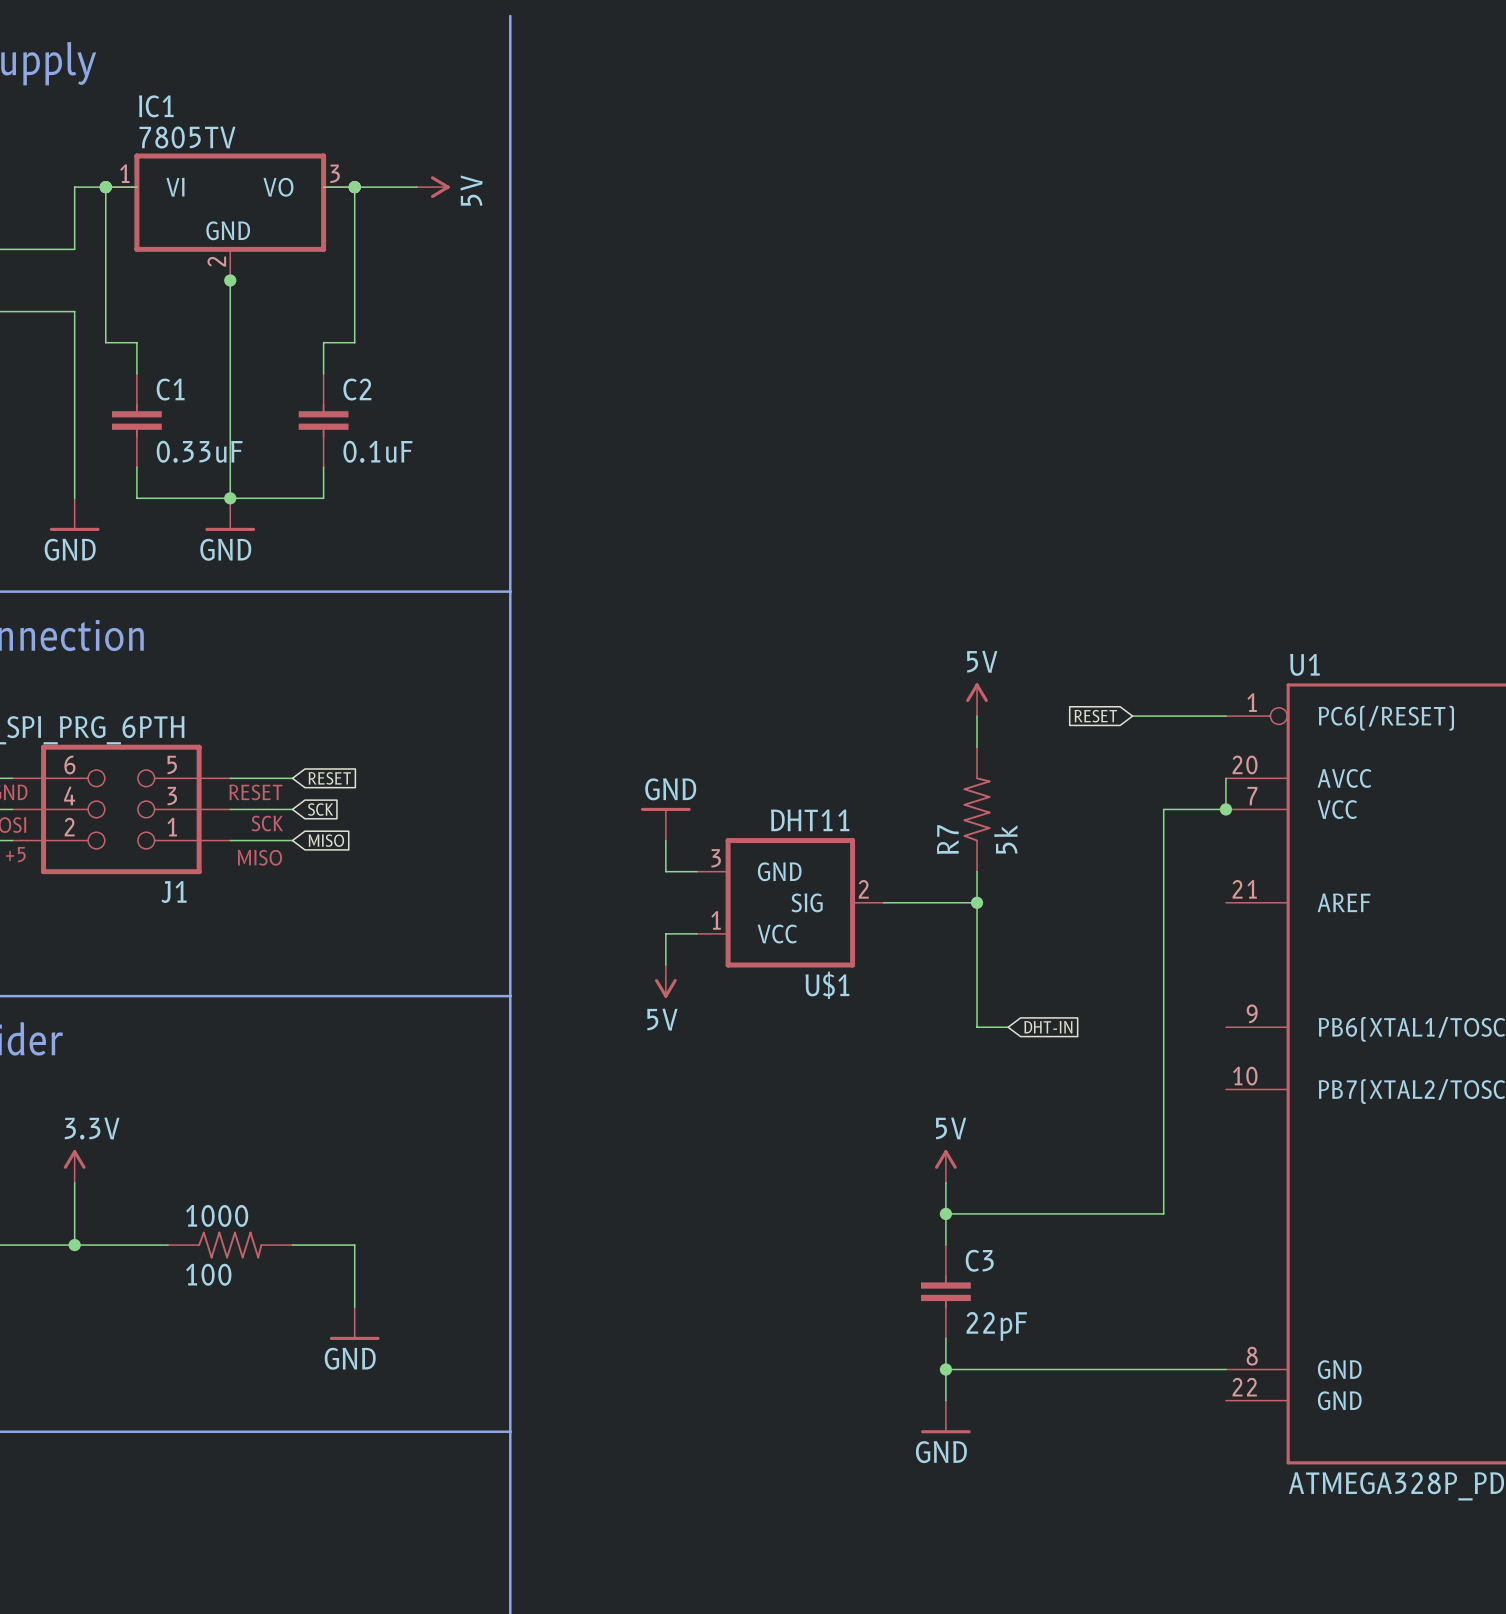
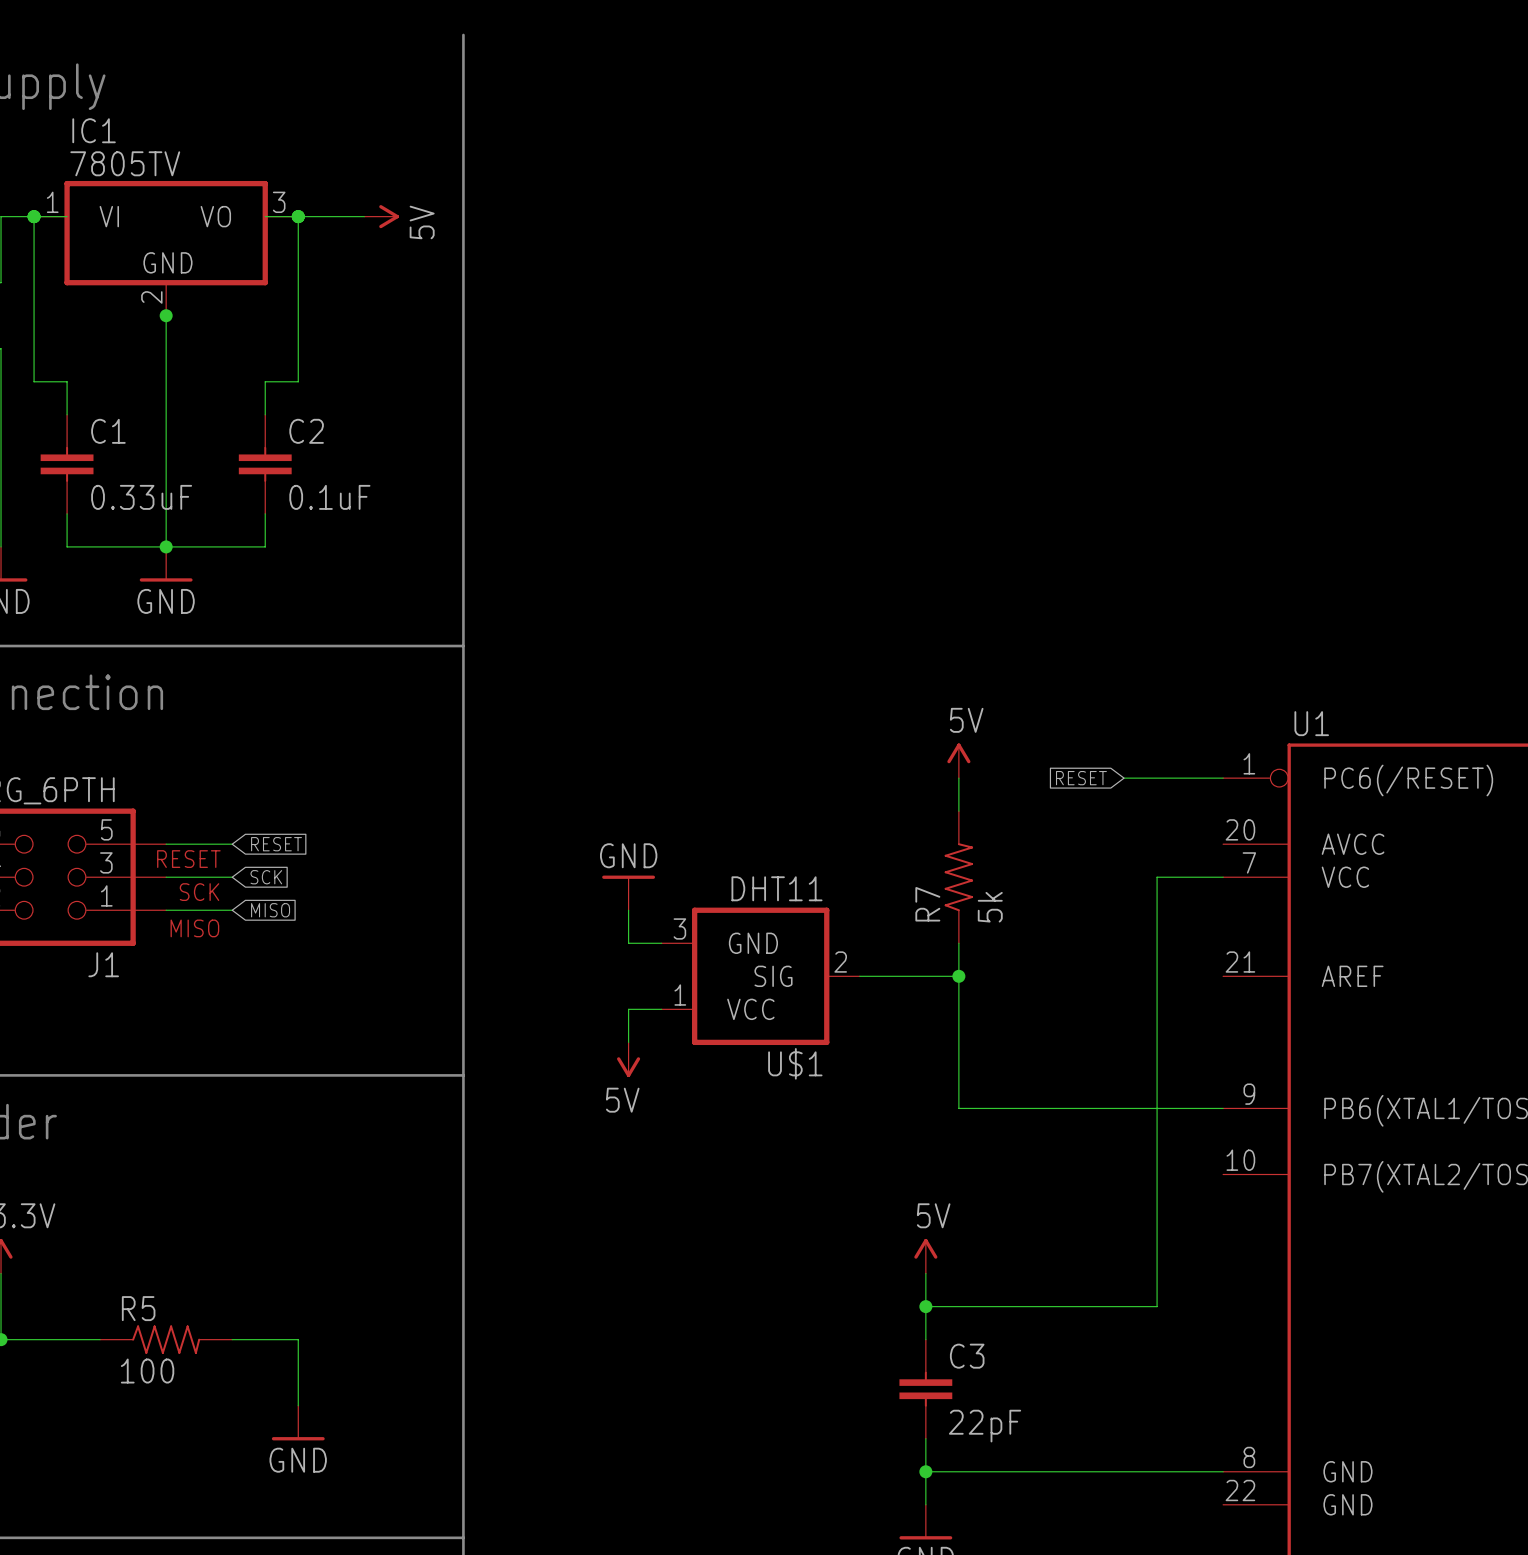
wire: (1225, 778) (1225, 809) -> none
junction: (1225, 809) -> none
wire: none -> (991, 1108) (1223, 1108)
global label: DHT-IN (1048, 1027) -> none
1000 name: 1000 (217, 1215) -> R5 (138, 1308)

